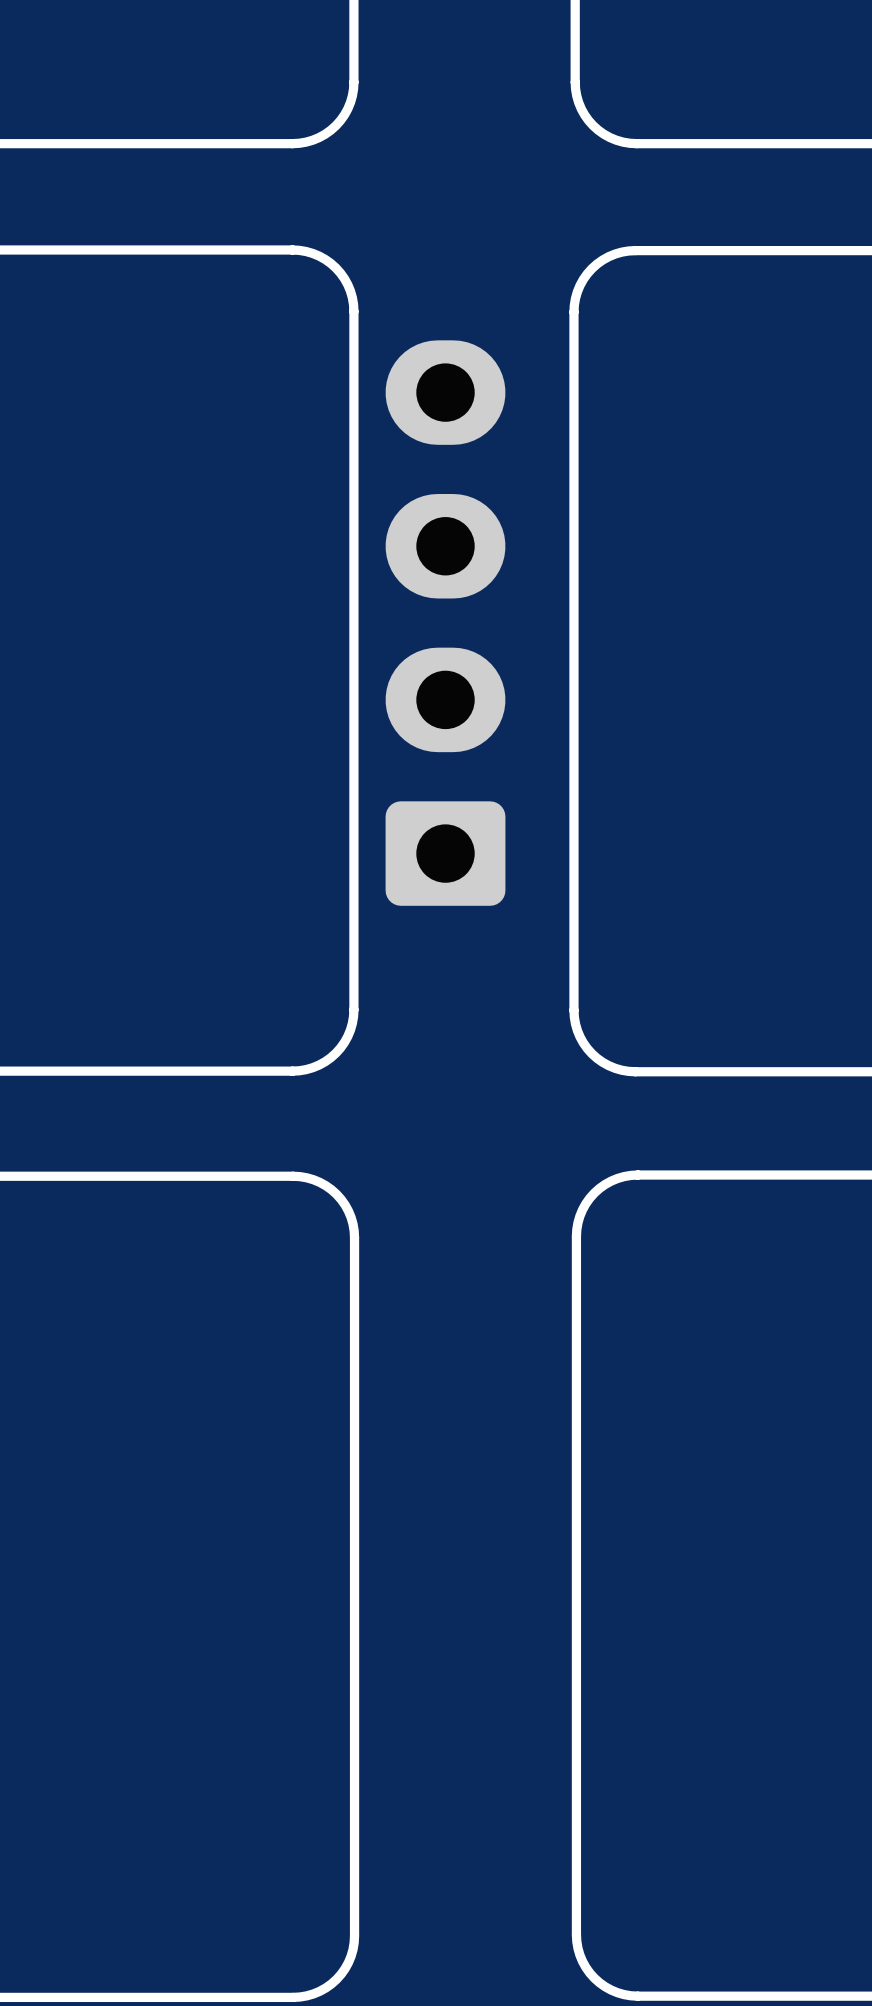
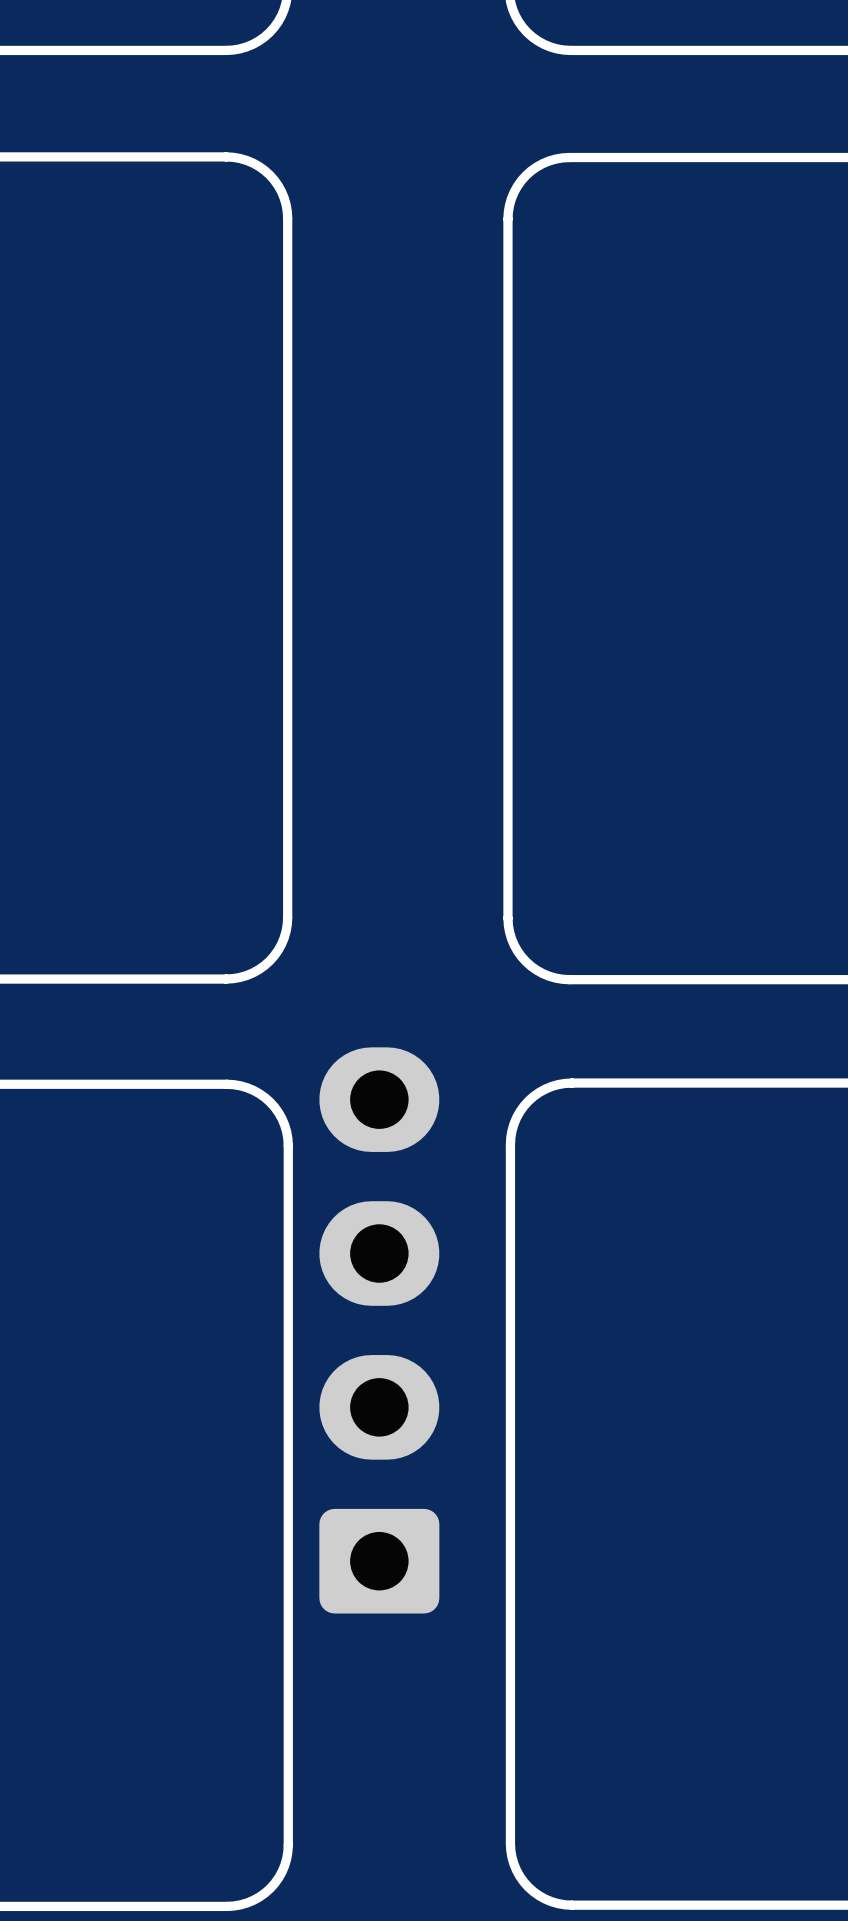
part position: (445, 623) -> (379, 1330)

